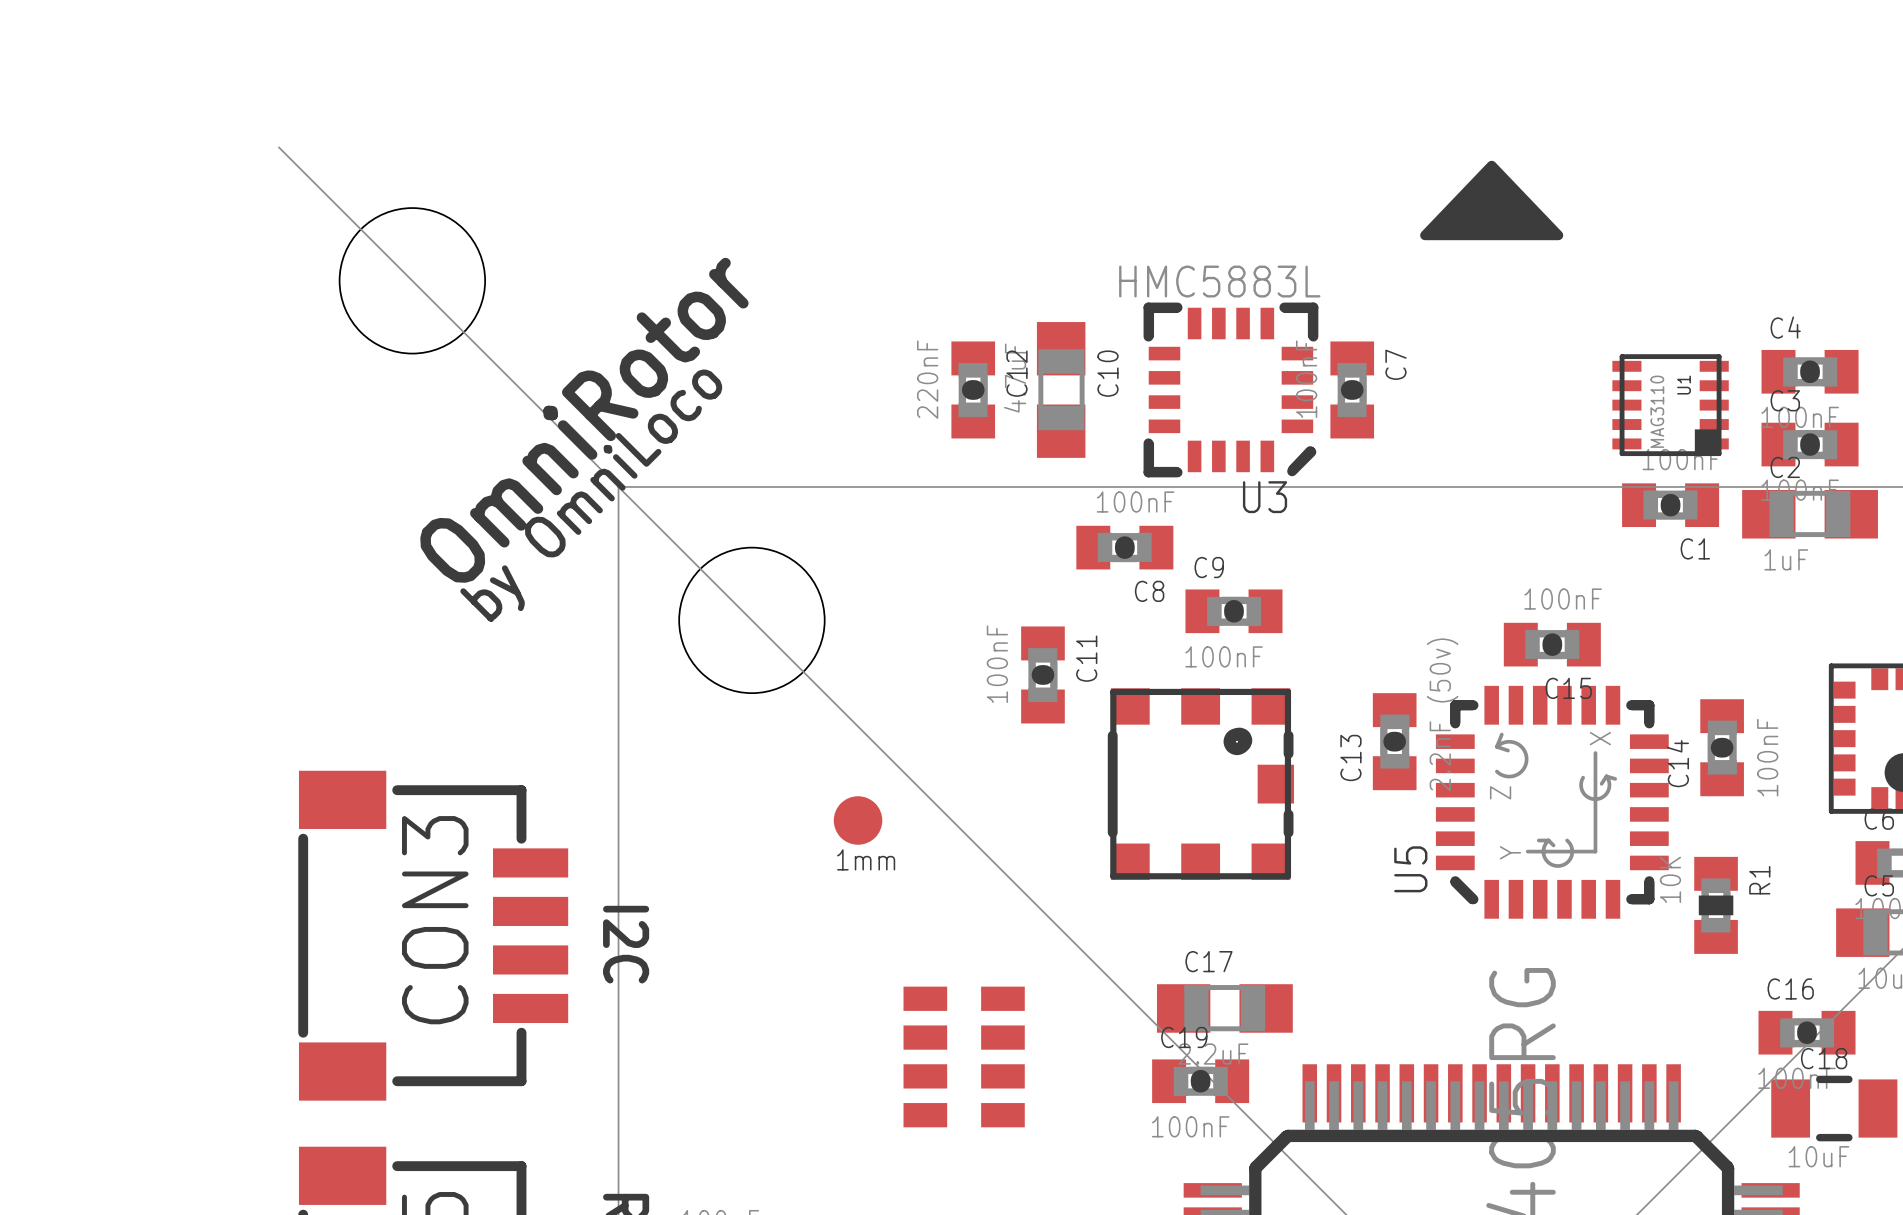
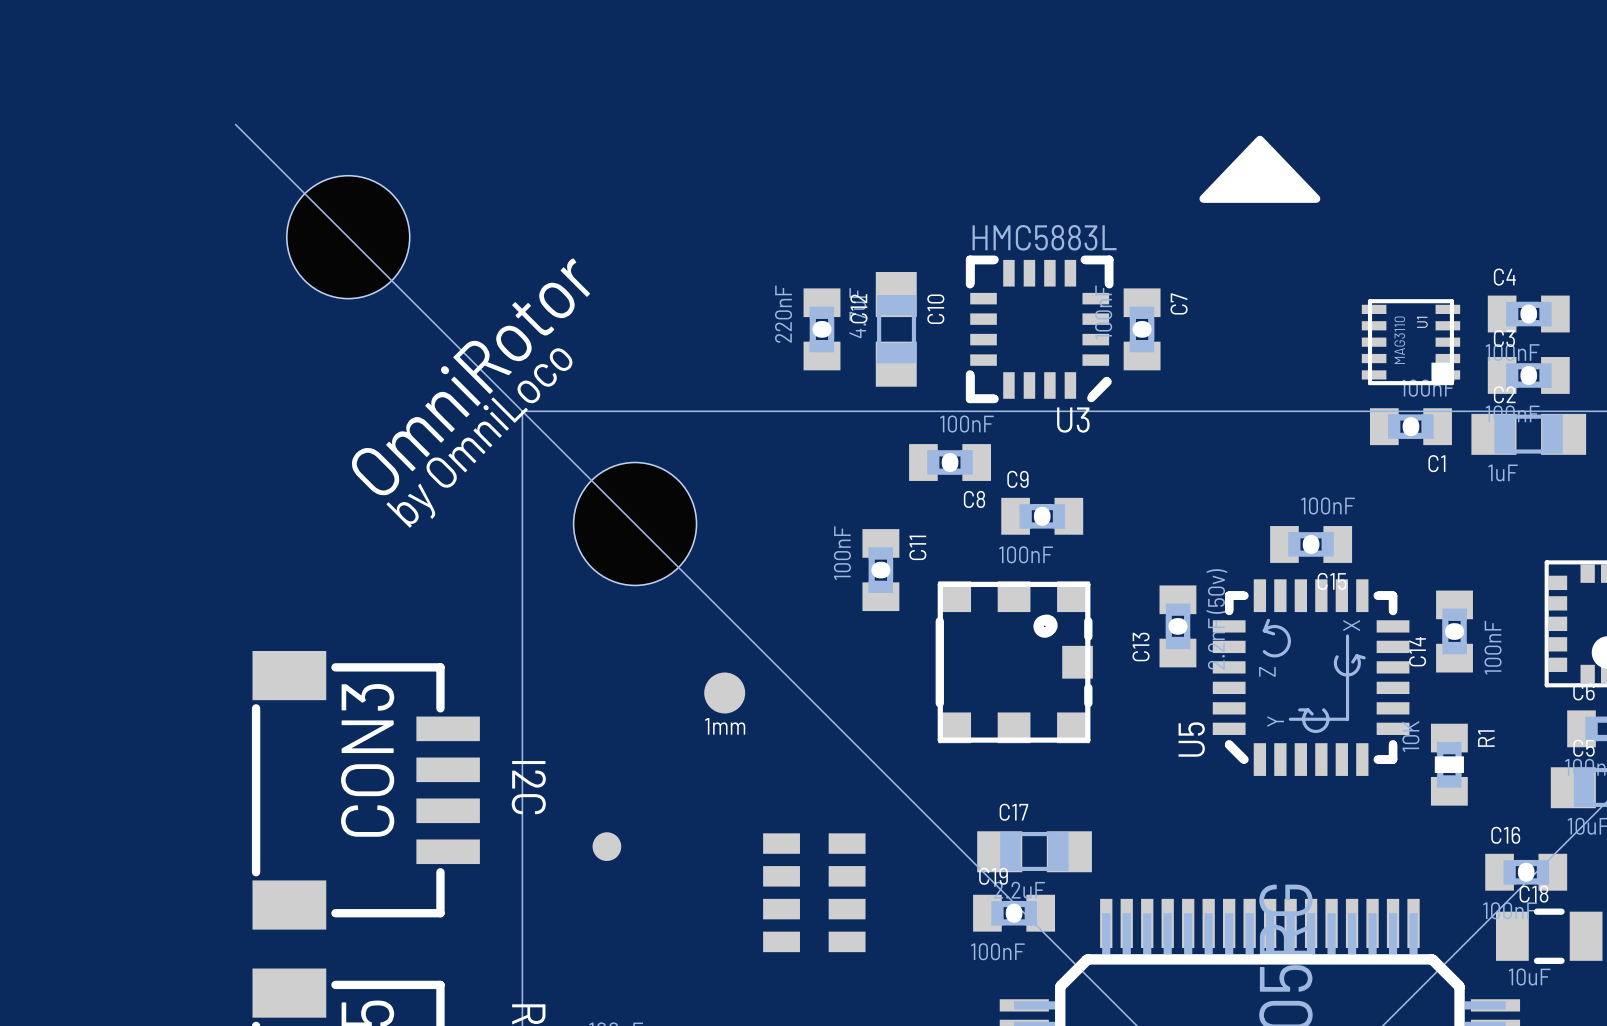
part: none -> (606, 846)

